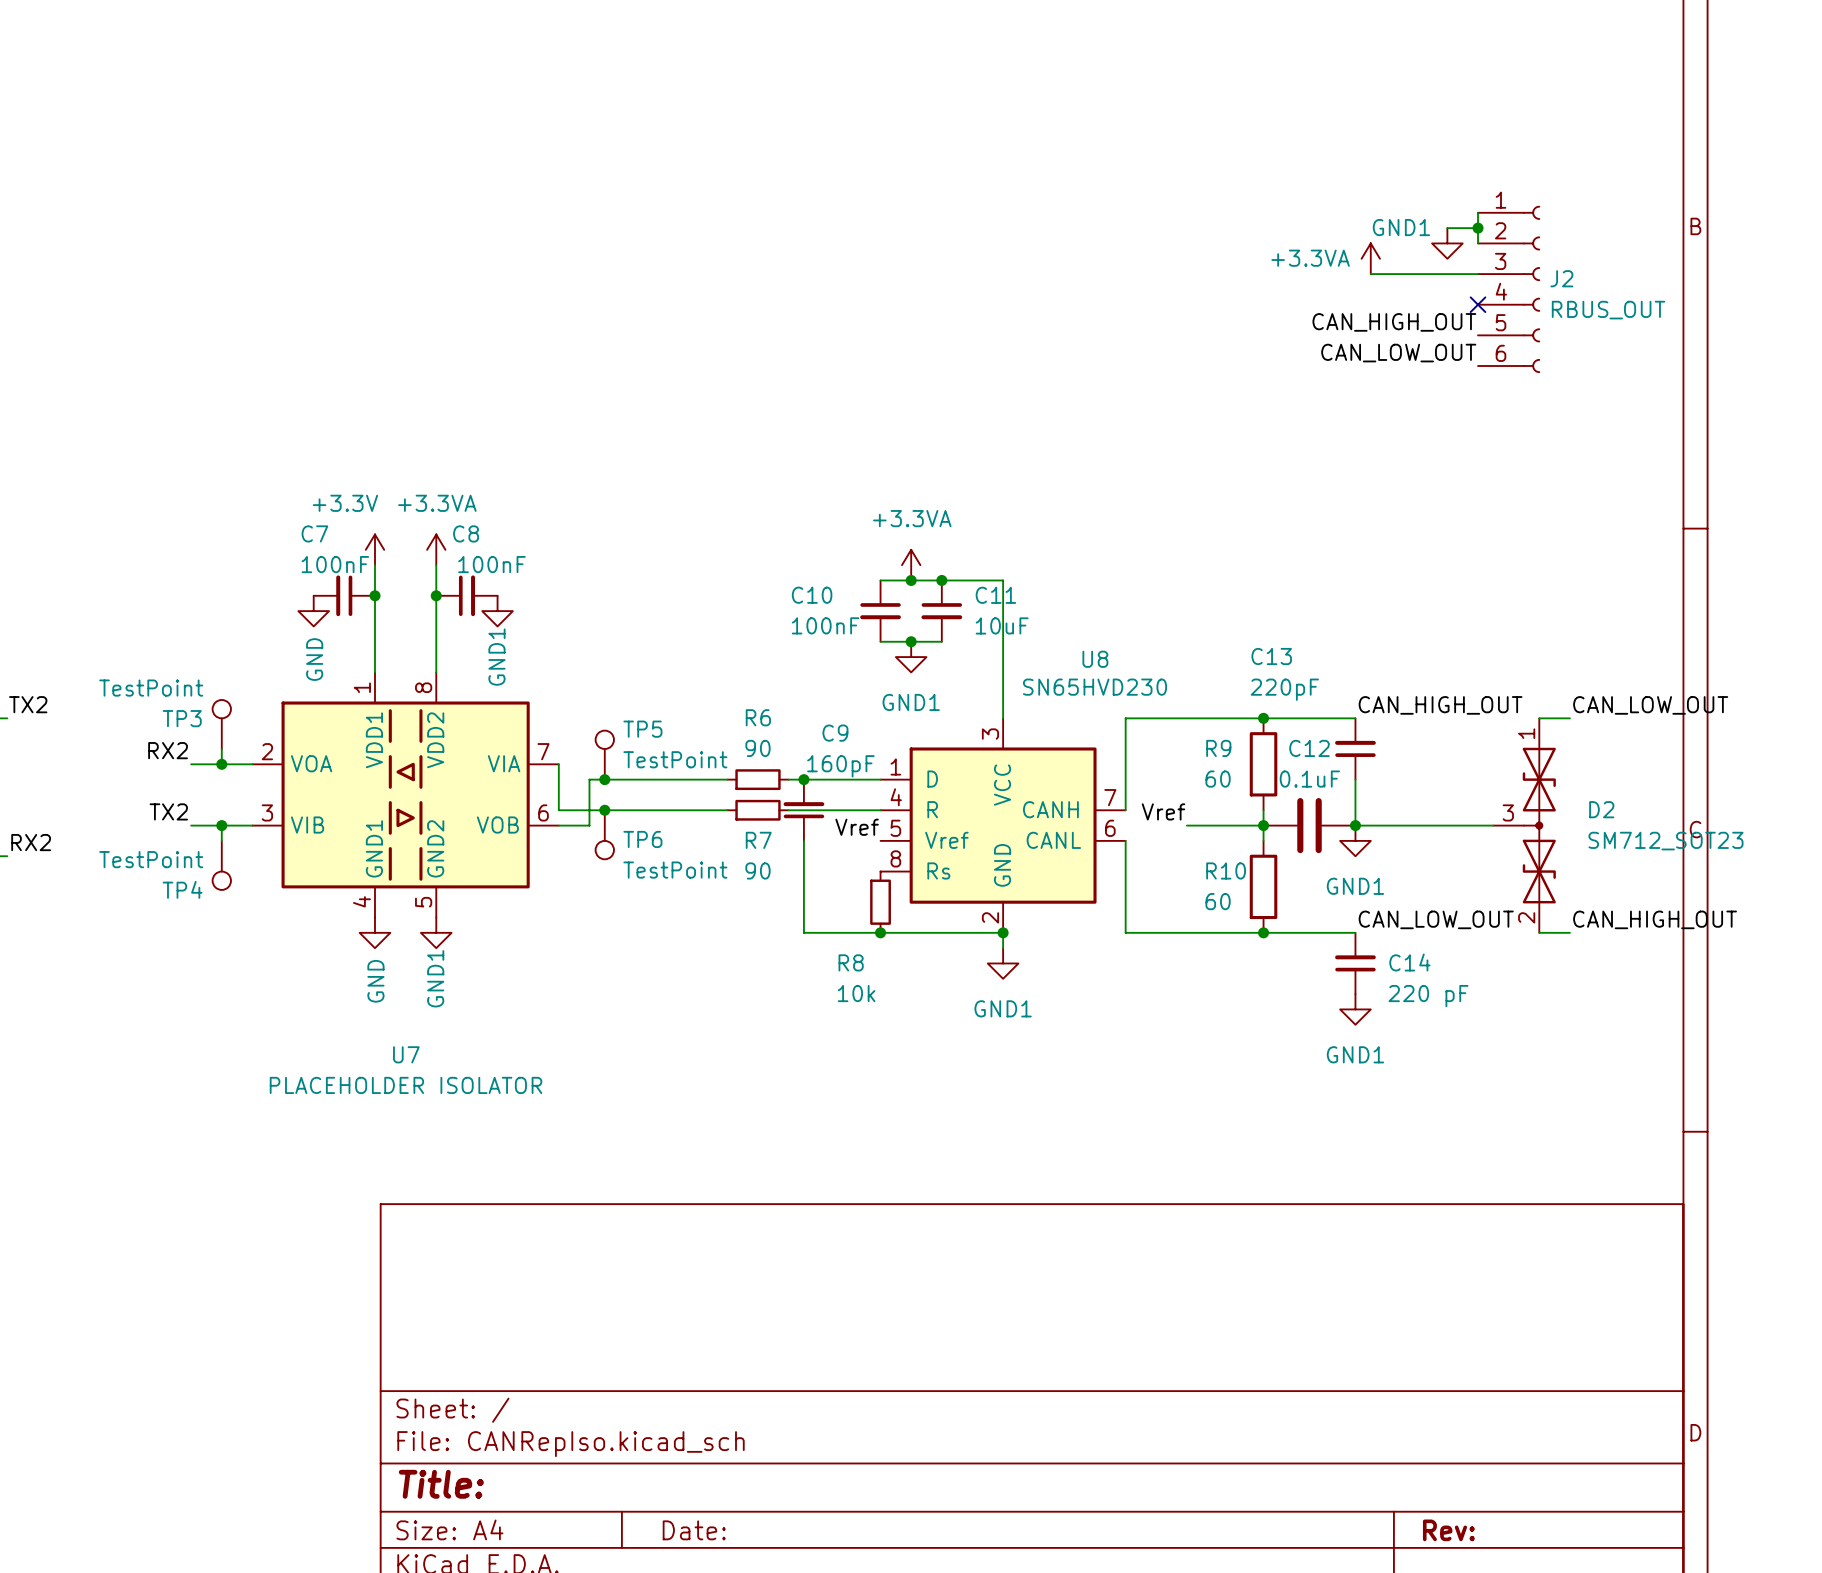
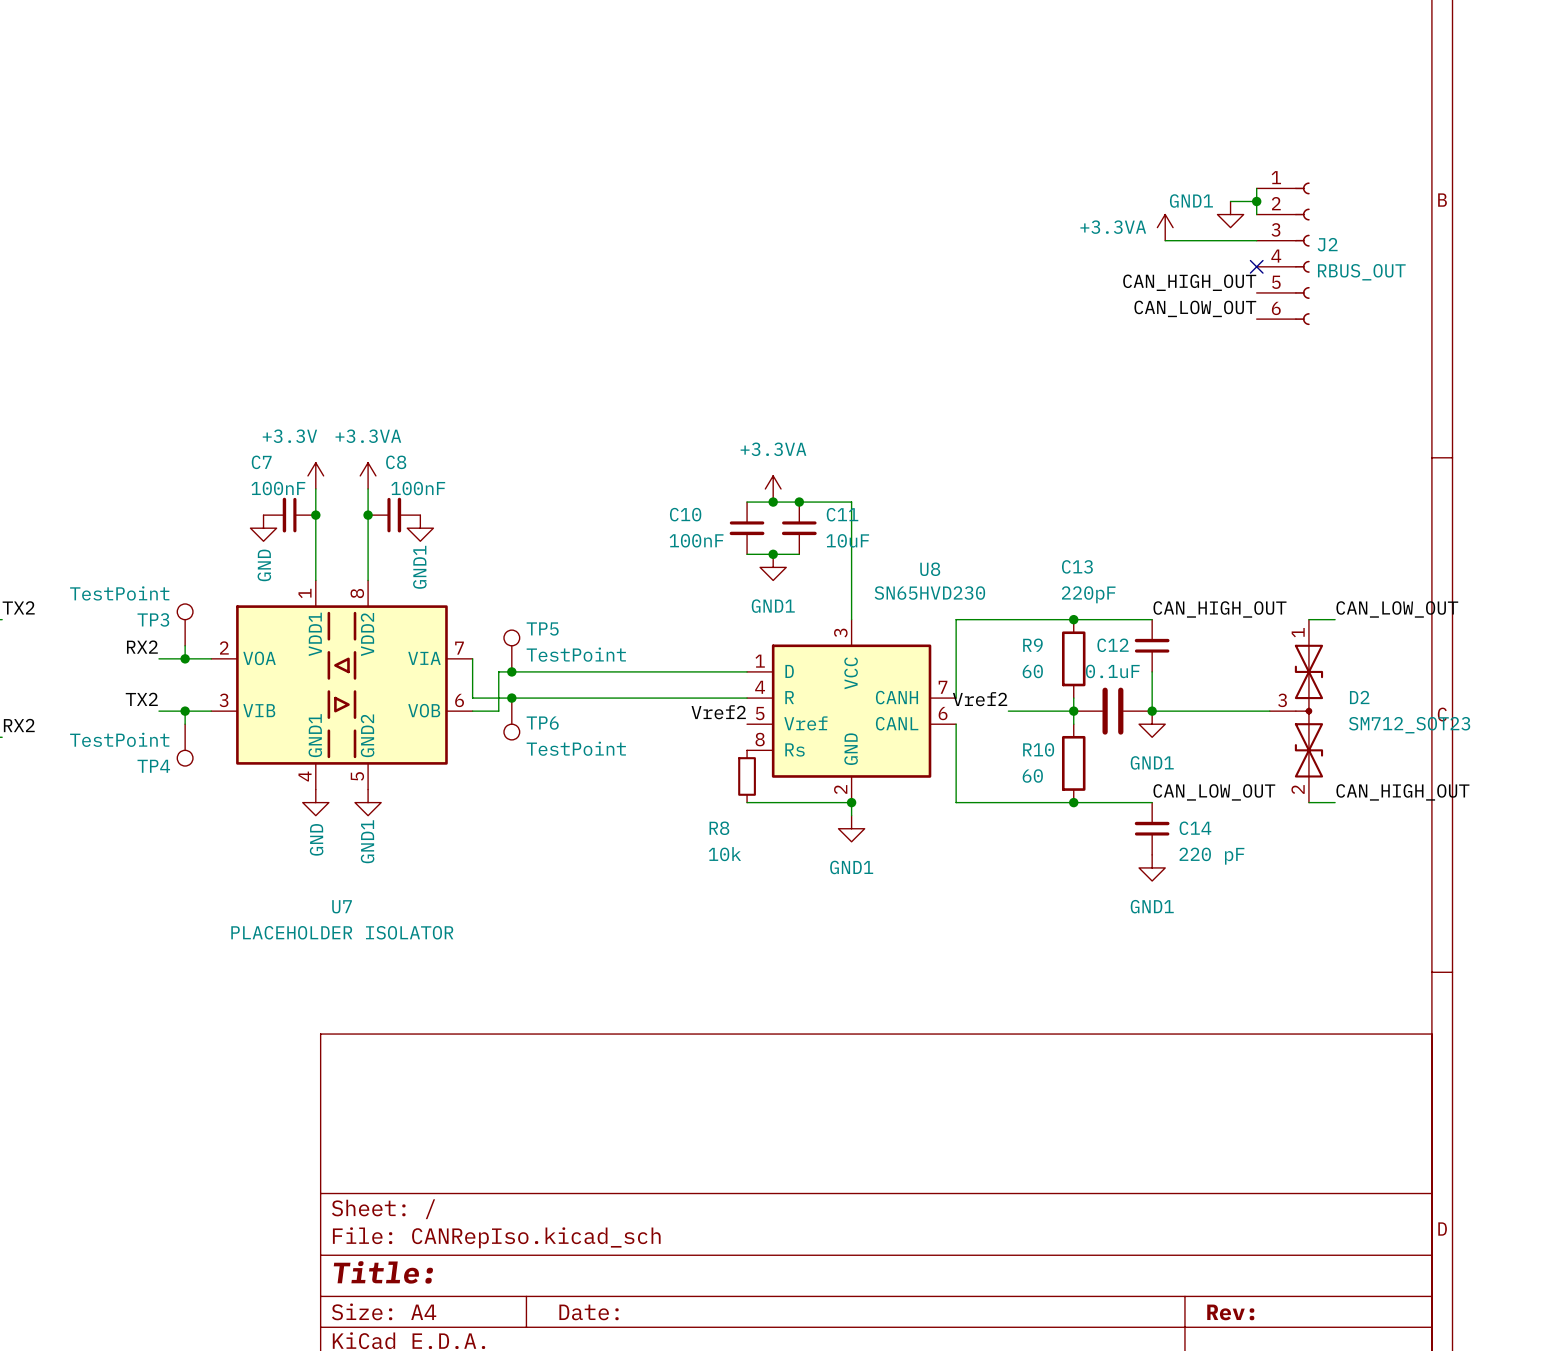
wire: none -> (616, 671) (668, 671)
R6: 90 (757, 779) -> none
junction: (803, 779) -> none
wire: none -> (616, 698) (668, 698)
R7: 90 (757, 810) -> none
C9: 160pF (803, 810) -> none
label: Vref (1163, 811) -> Vref2 (980, 699)
label: Vref (857, 827) -> Vref2 (718, 712)
wire: (803, 840) (803, 932) (880, 932) -> none
junction: (880, 932) -> none

